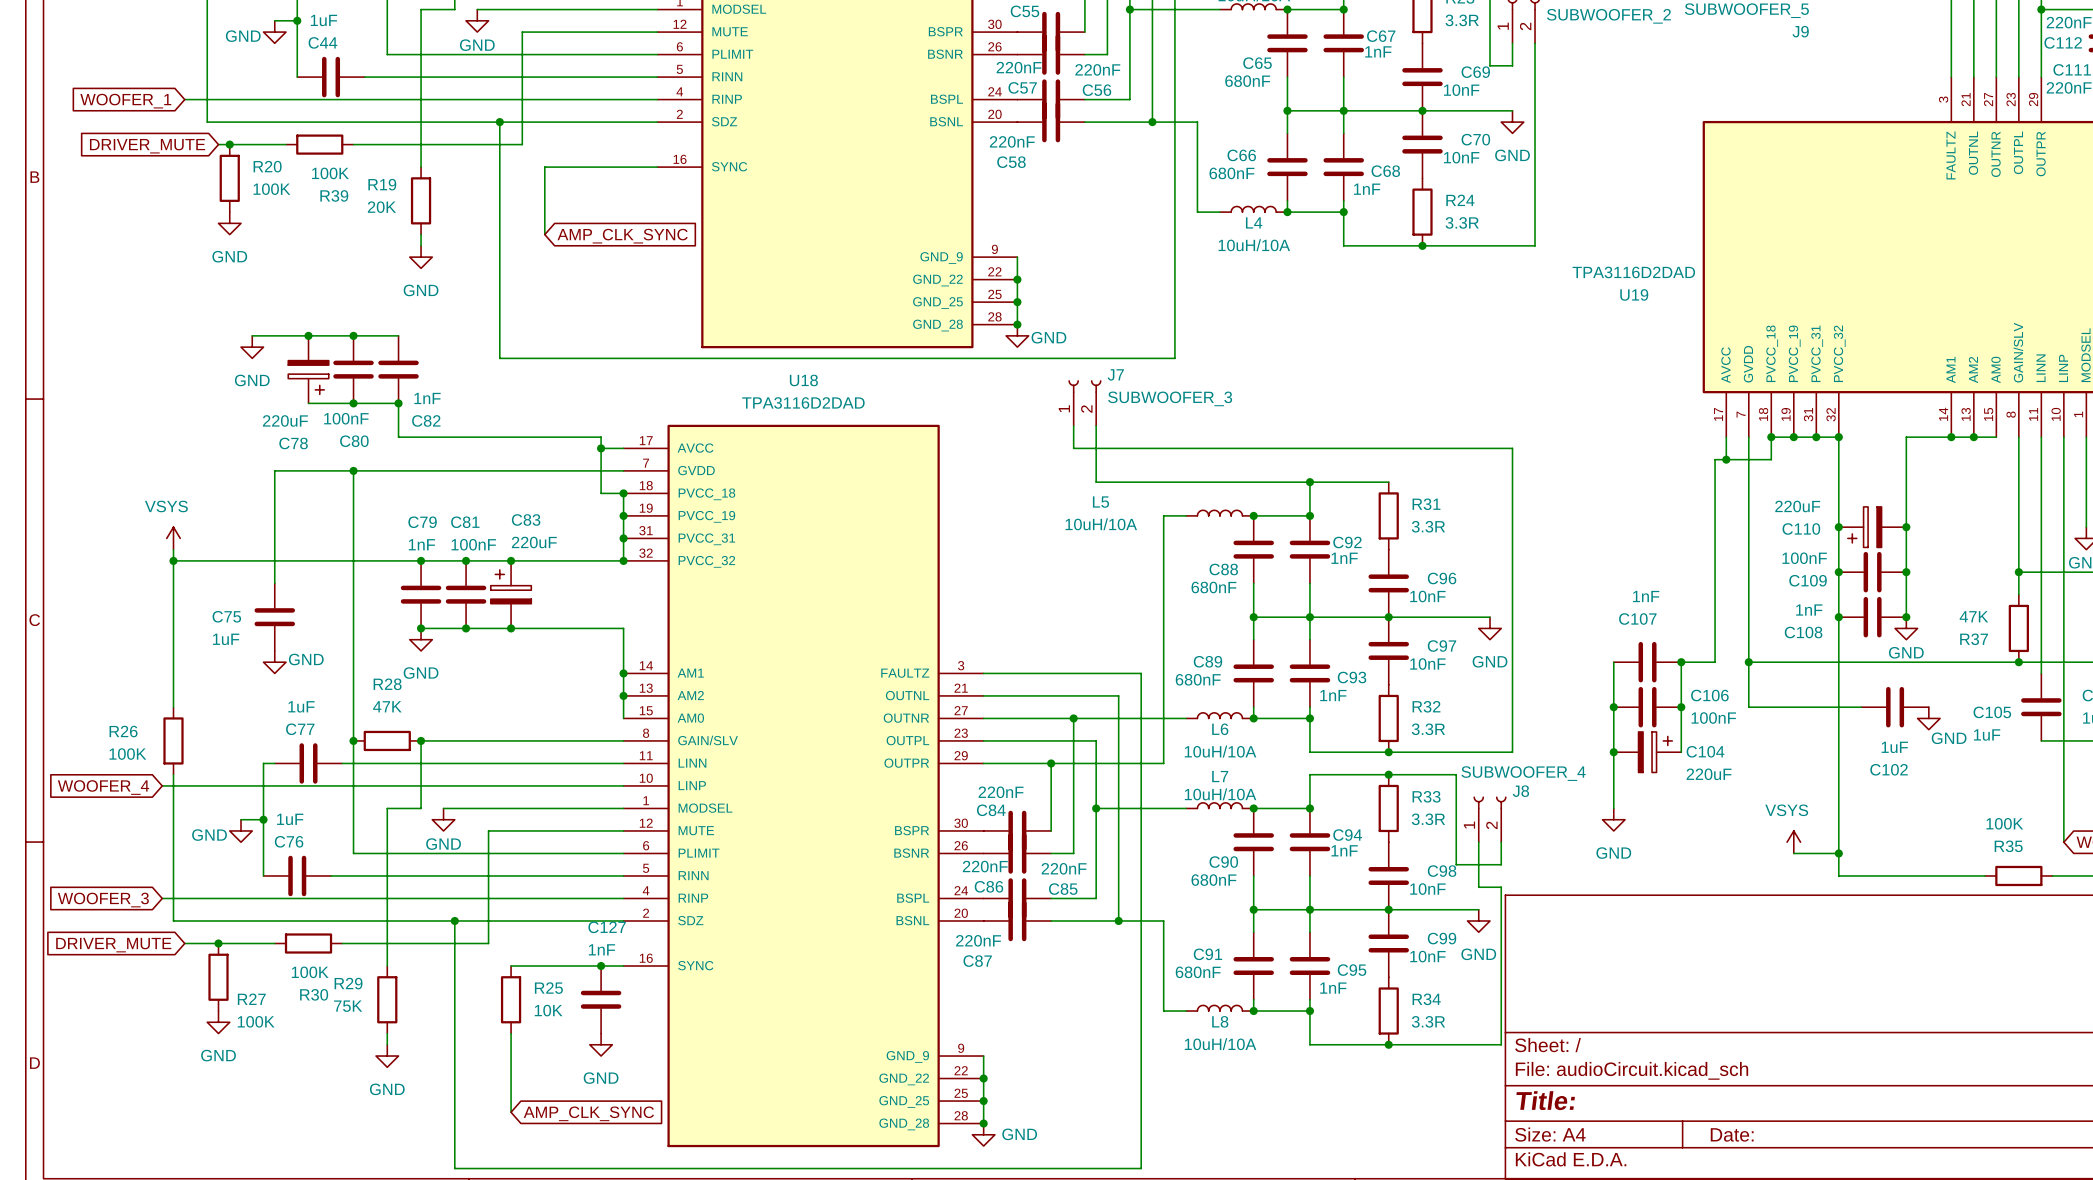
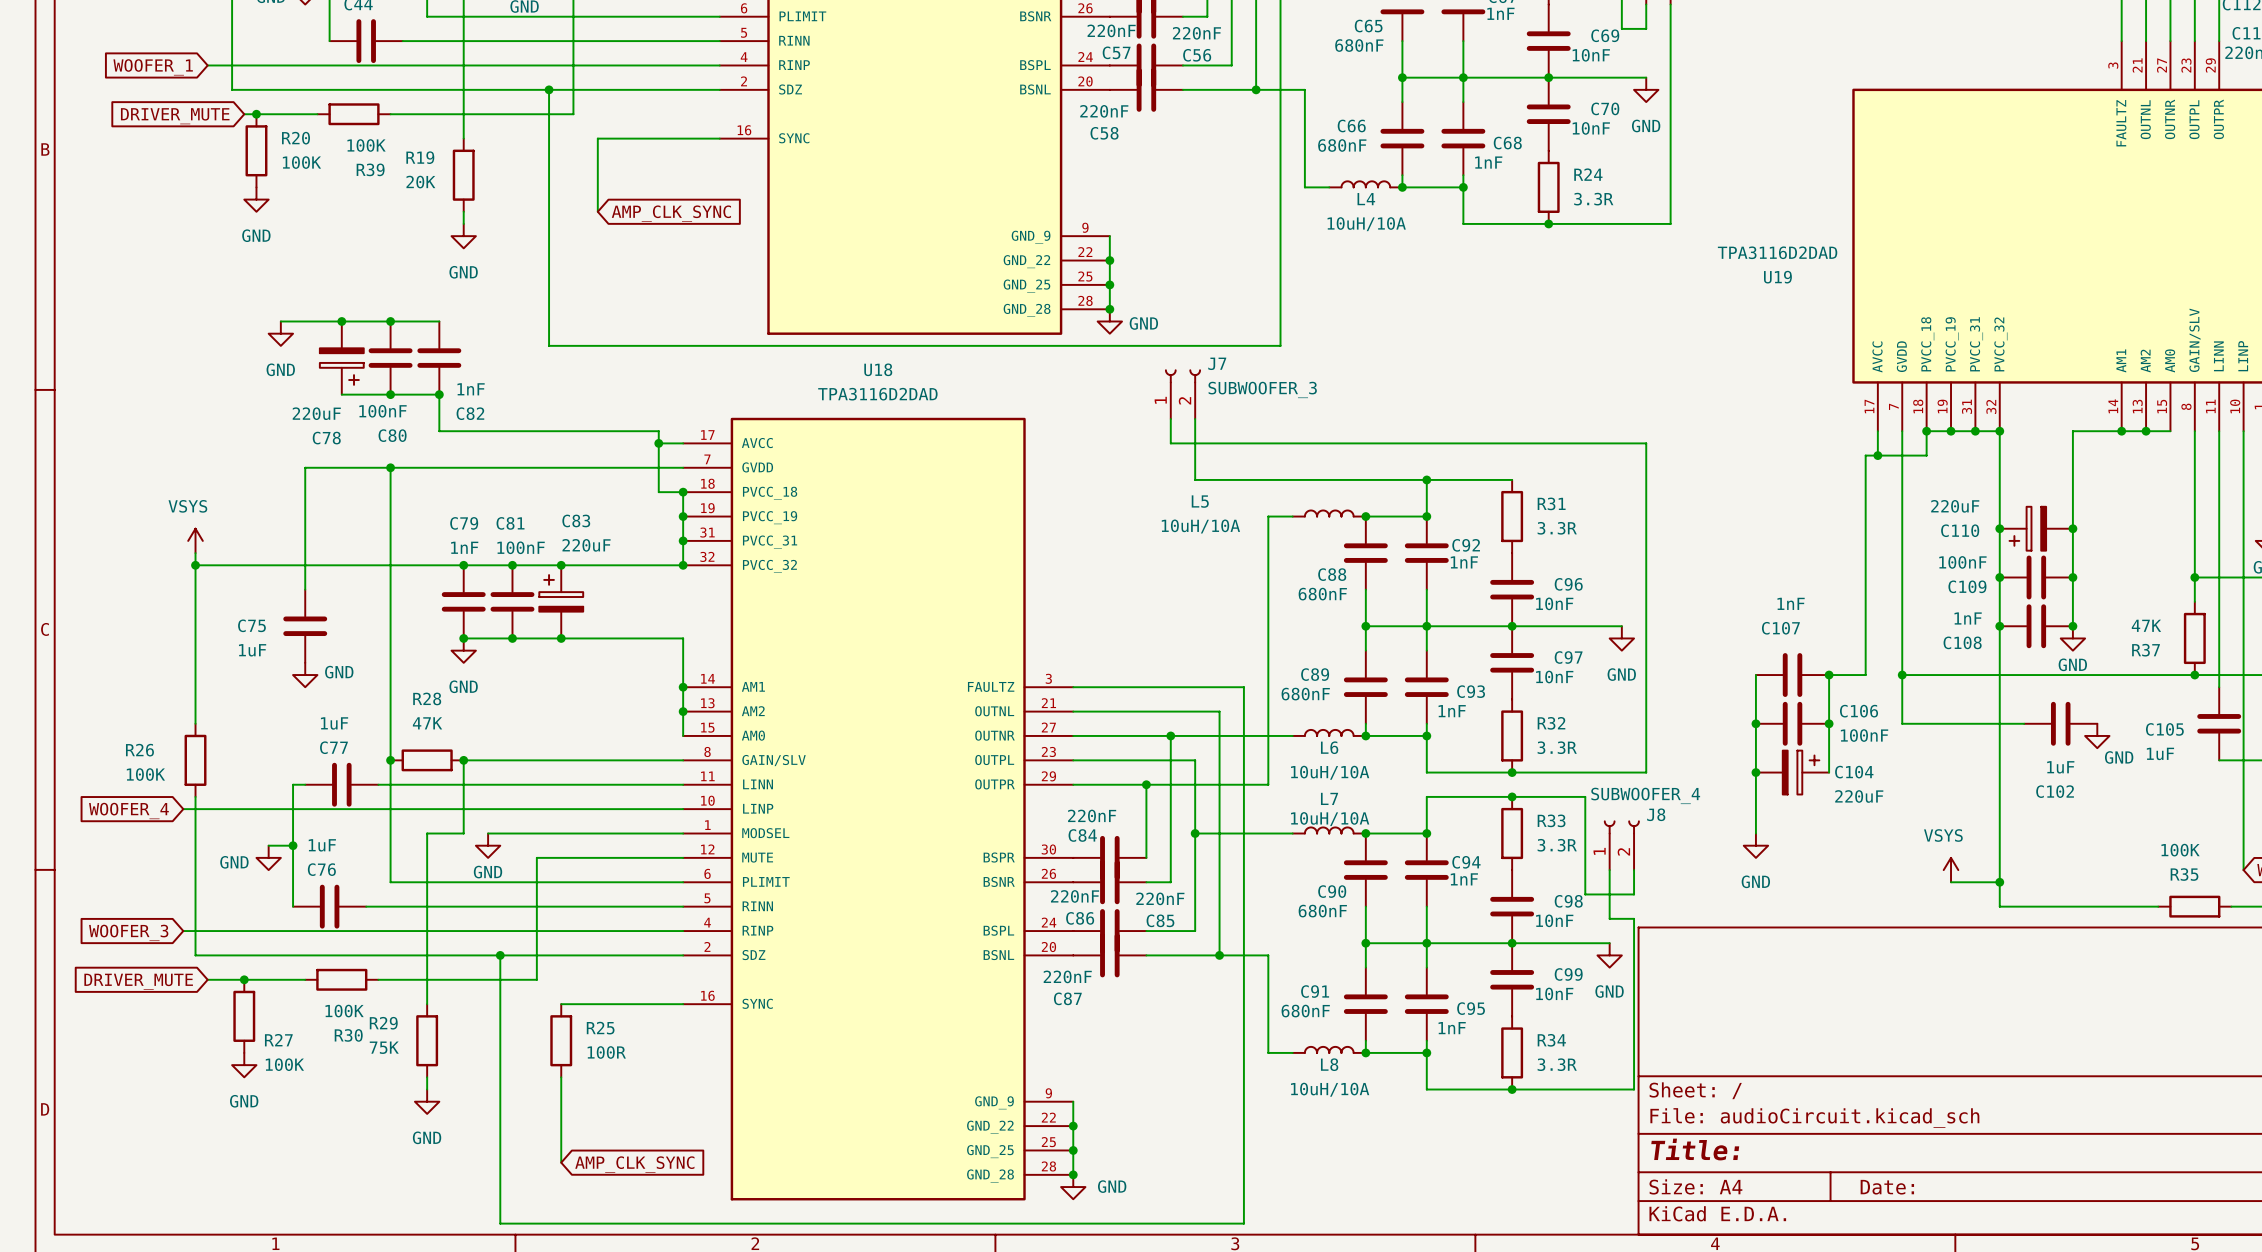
junction: (601, 966) -> none
C127: 1nF (601, 999) -> none
R25 value: 10K (548, 1010) -> 100R (606, 1052)
power symbol: GND (601, 1044) -> none

